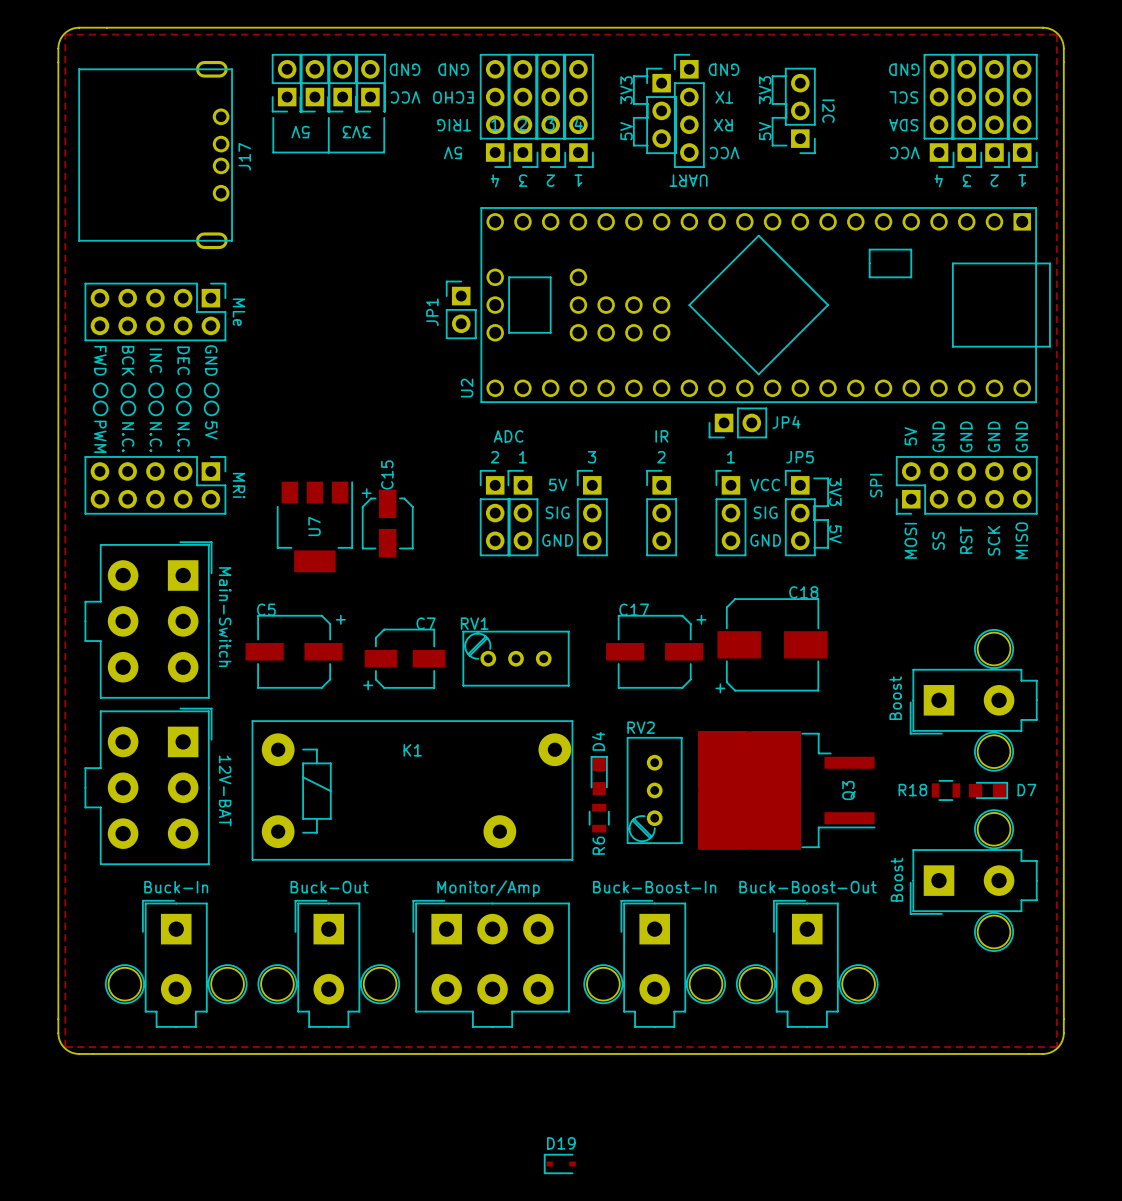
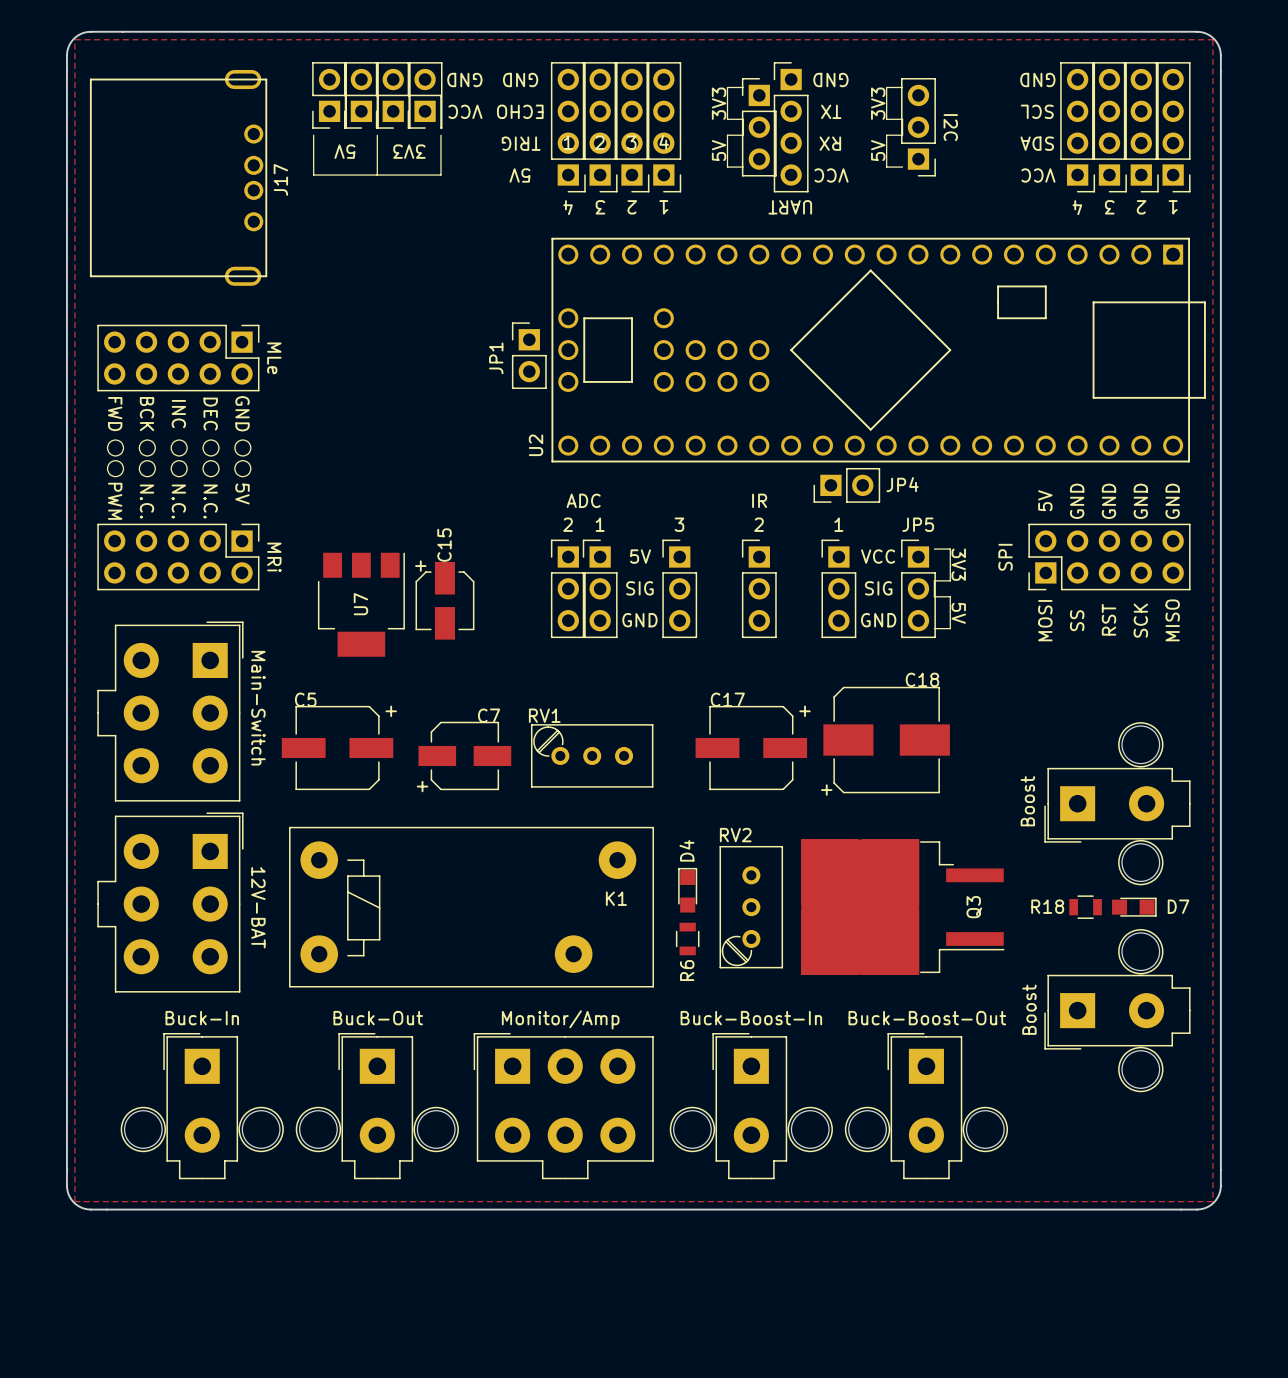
K1 footprint: [251, 720, 574, 861] -> [289, 826, 654, 988]
K1 name position: K1 (412, 750) -> K1 (616, 898)
D19: (559, 1163) -> none

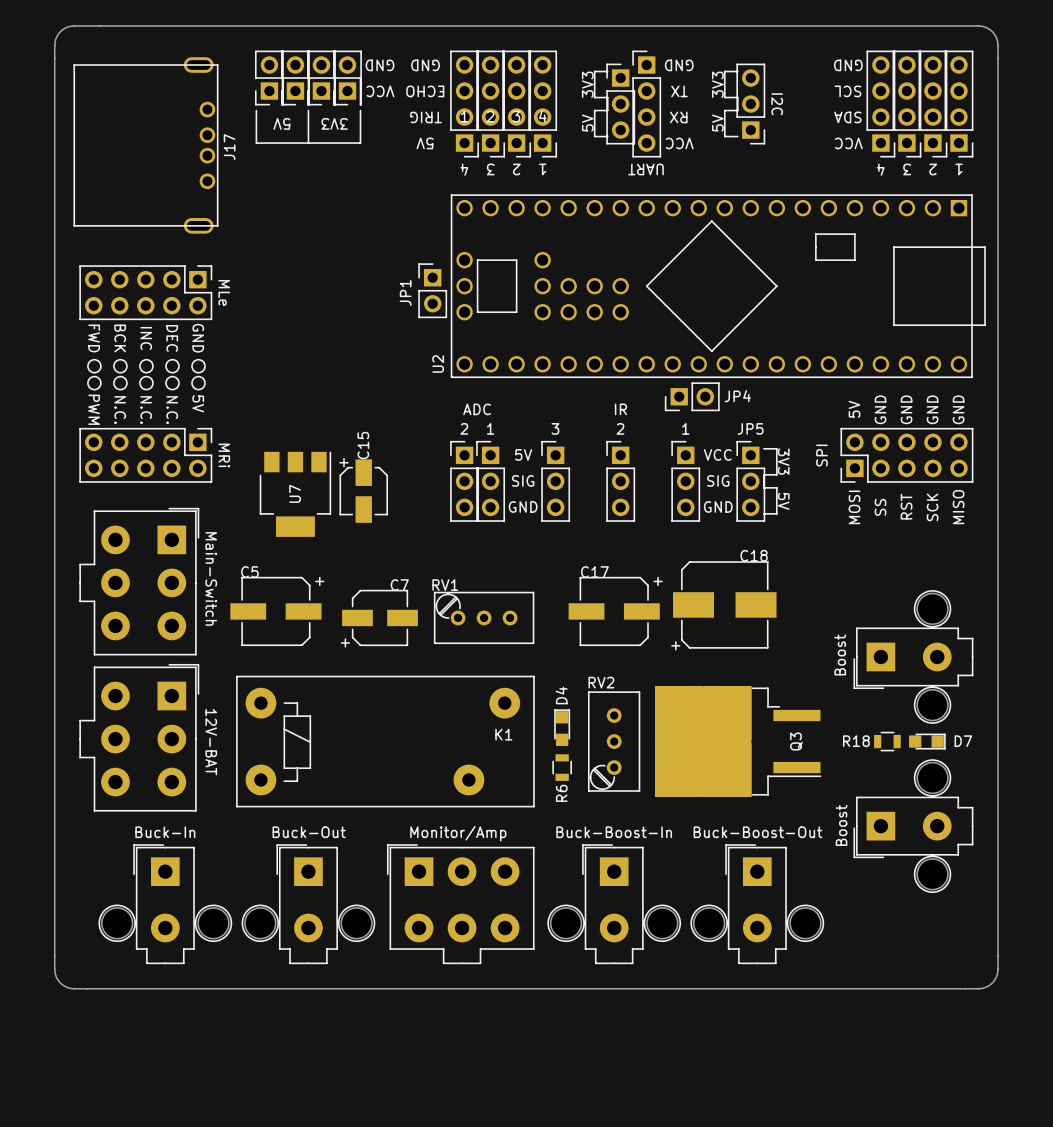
zone outline: (74, 39) (1212, 39) (1212, 1201) (74, 1201) (74, 39) -> none

